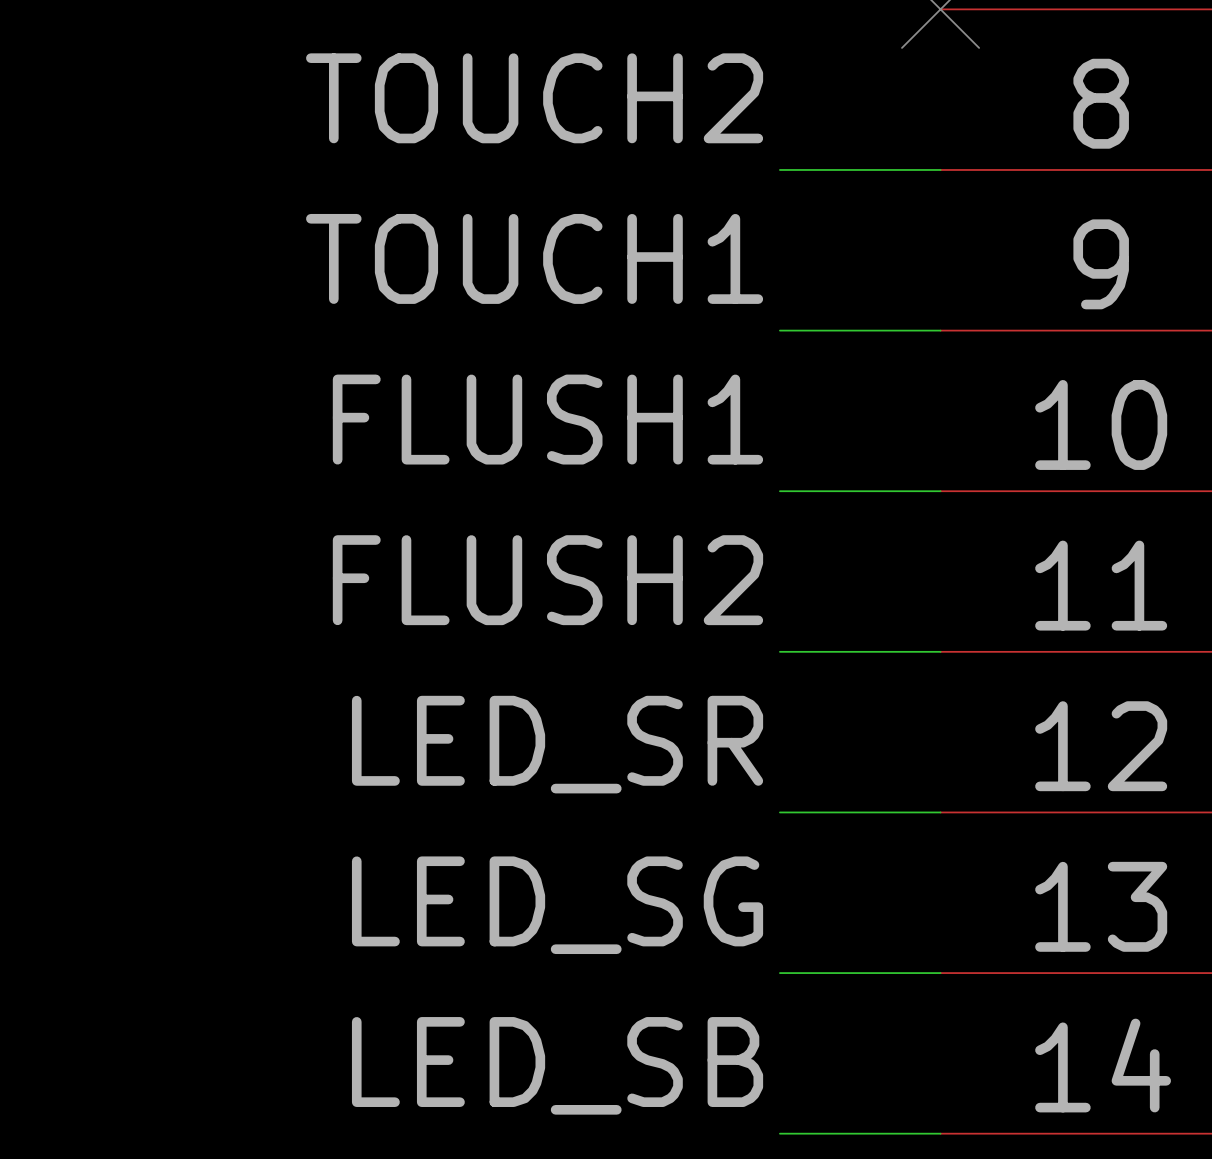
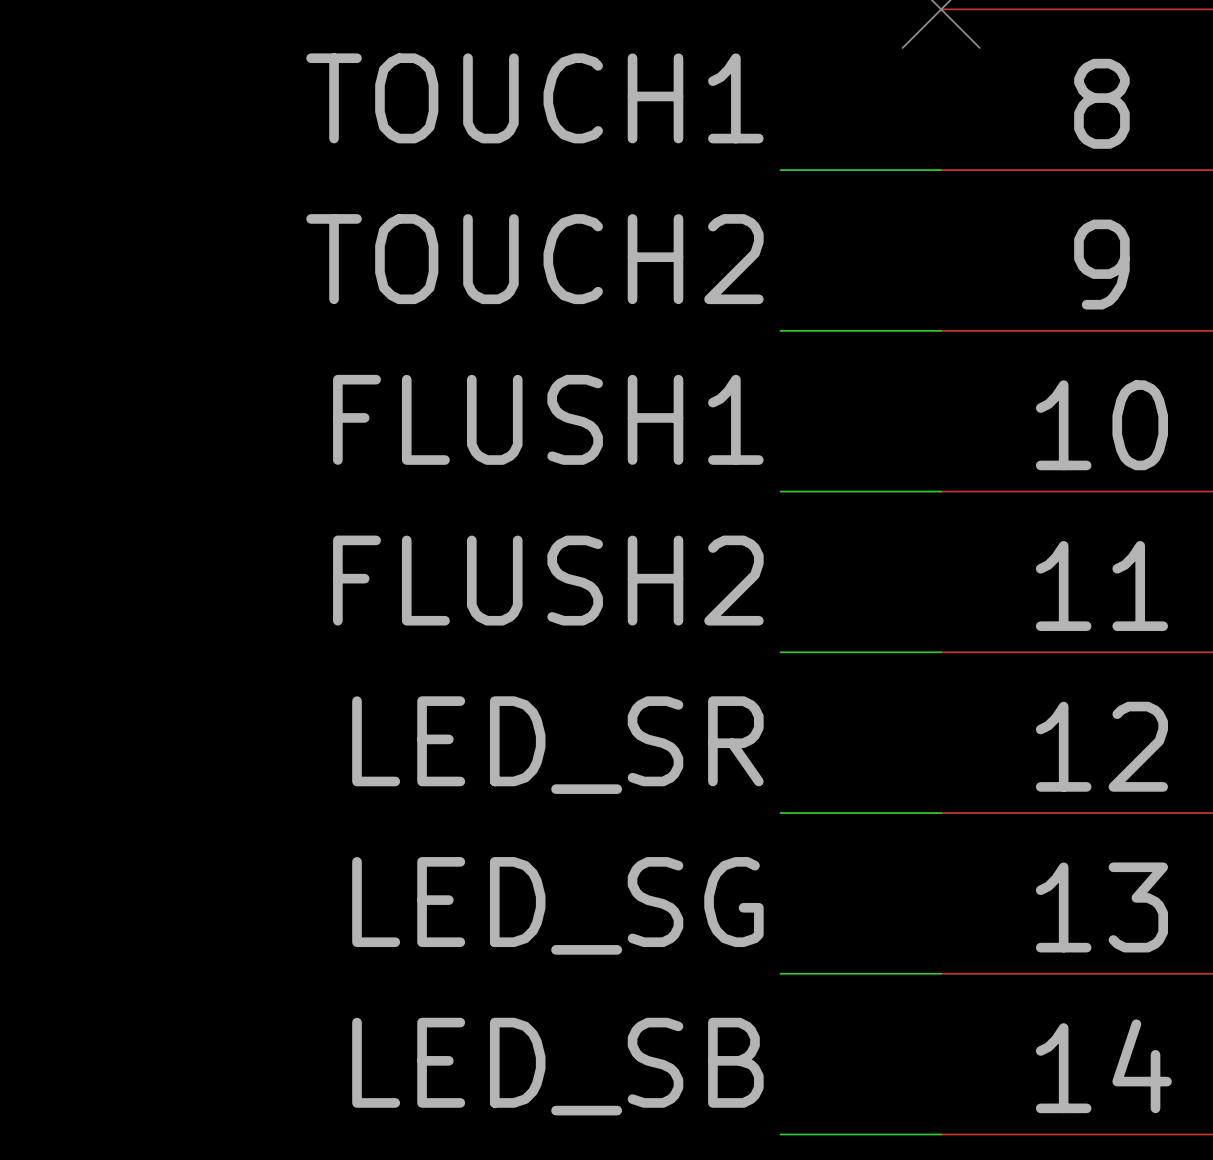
label: TOUCH2 (534, 98) -> TOUCH1 (534, 98)
label: TOUCH1 (534, 258) -> TOUCH2 (534, 259)

